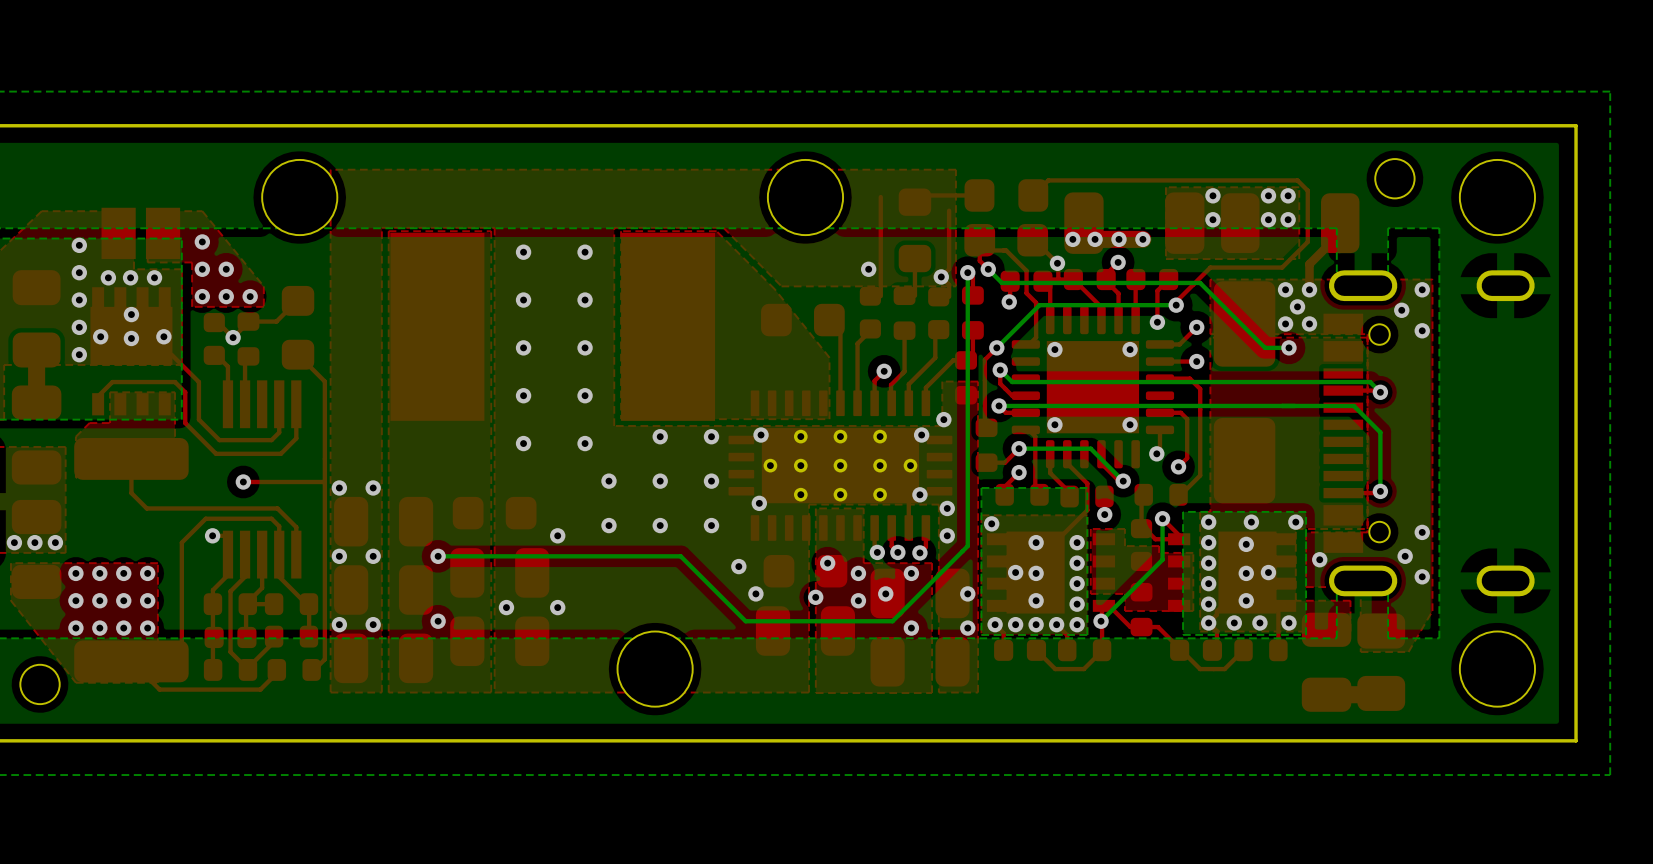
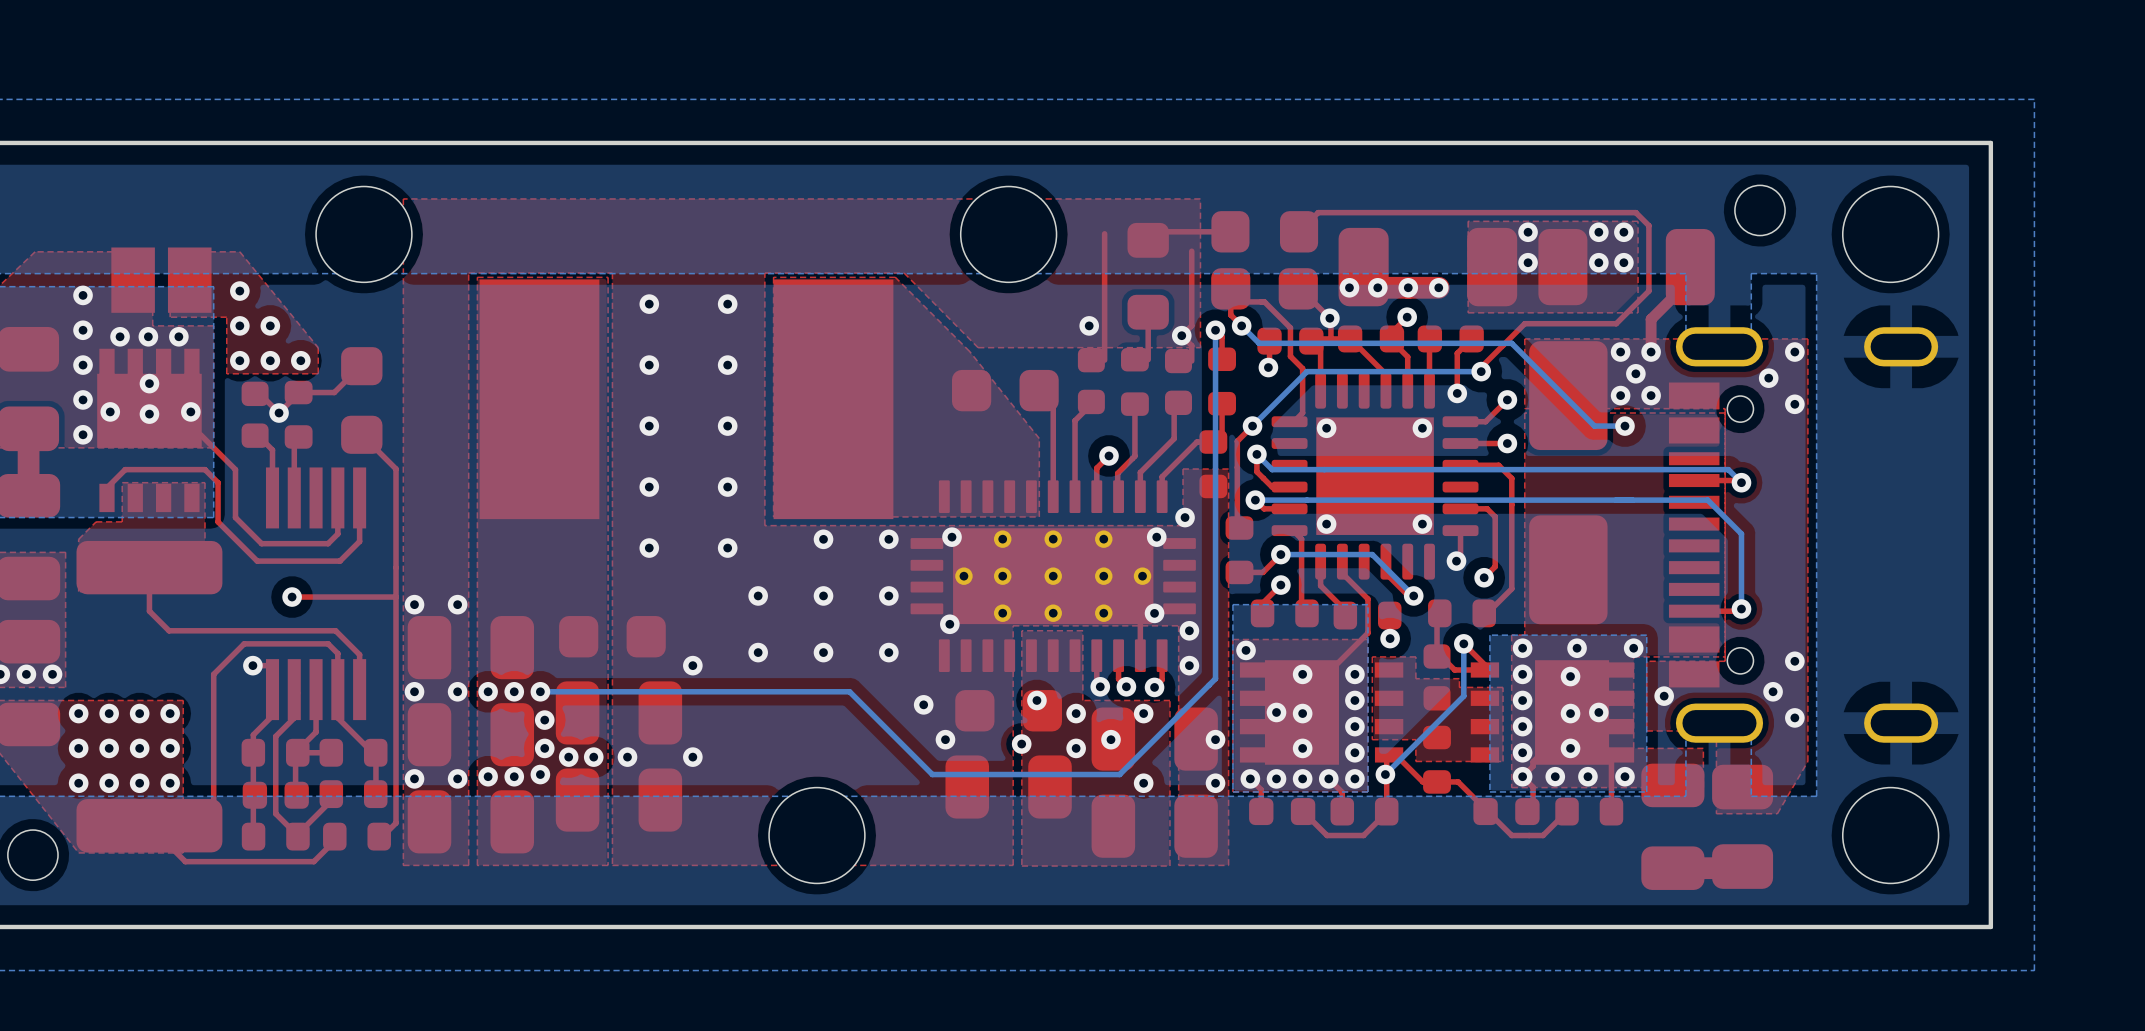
via: none -> (488, 691)
via: none -> (514, 691)
via: none -> (544, 720)
via: none -> (544, 748)
via: none -> (568, 757)
via: none -> (593, 757)
via: none -> (488, 776)
via: none -> (514, 776)

